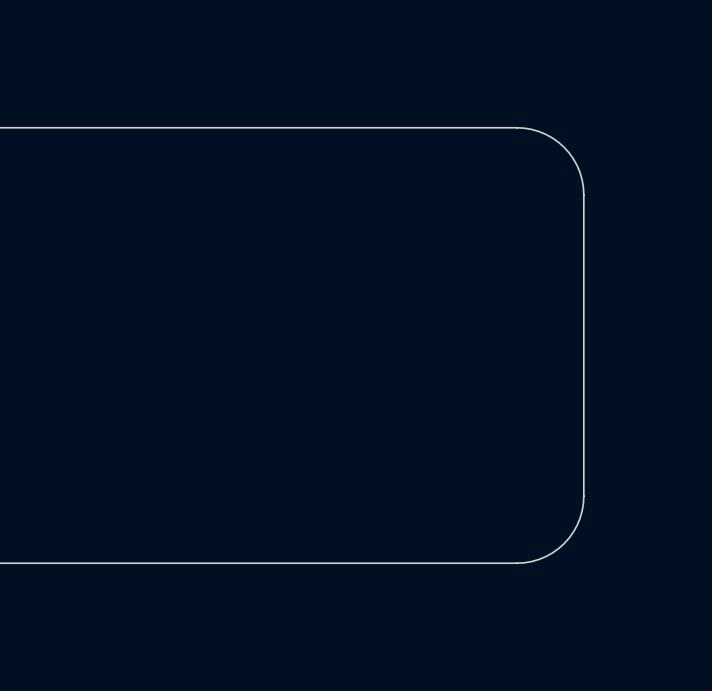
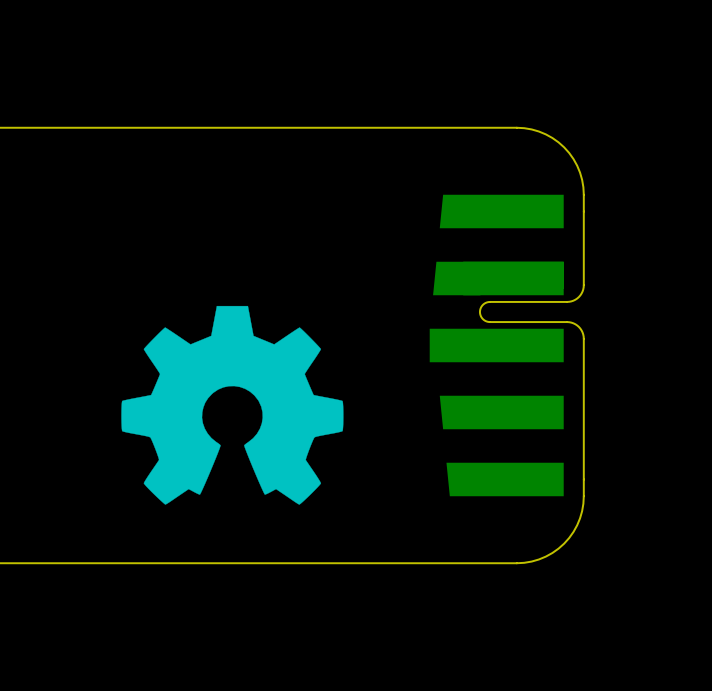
board edge: (583, 211) (583, 479) -> none
drawing: none -> [121, 305, 344, 505]
part: none -> (507, 345)

